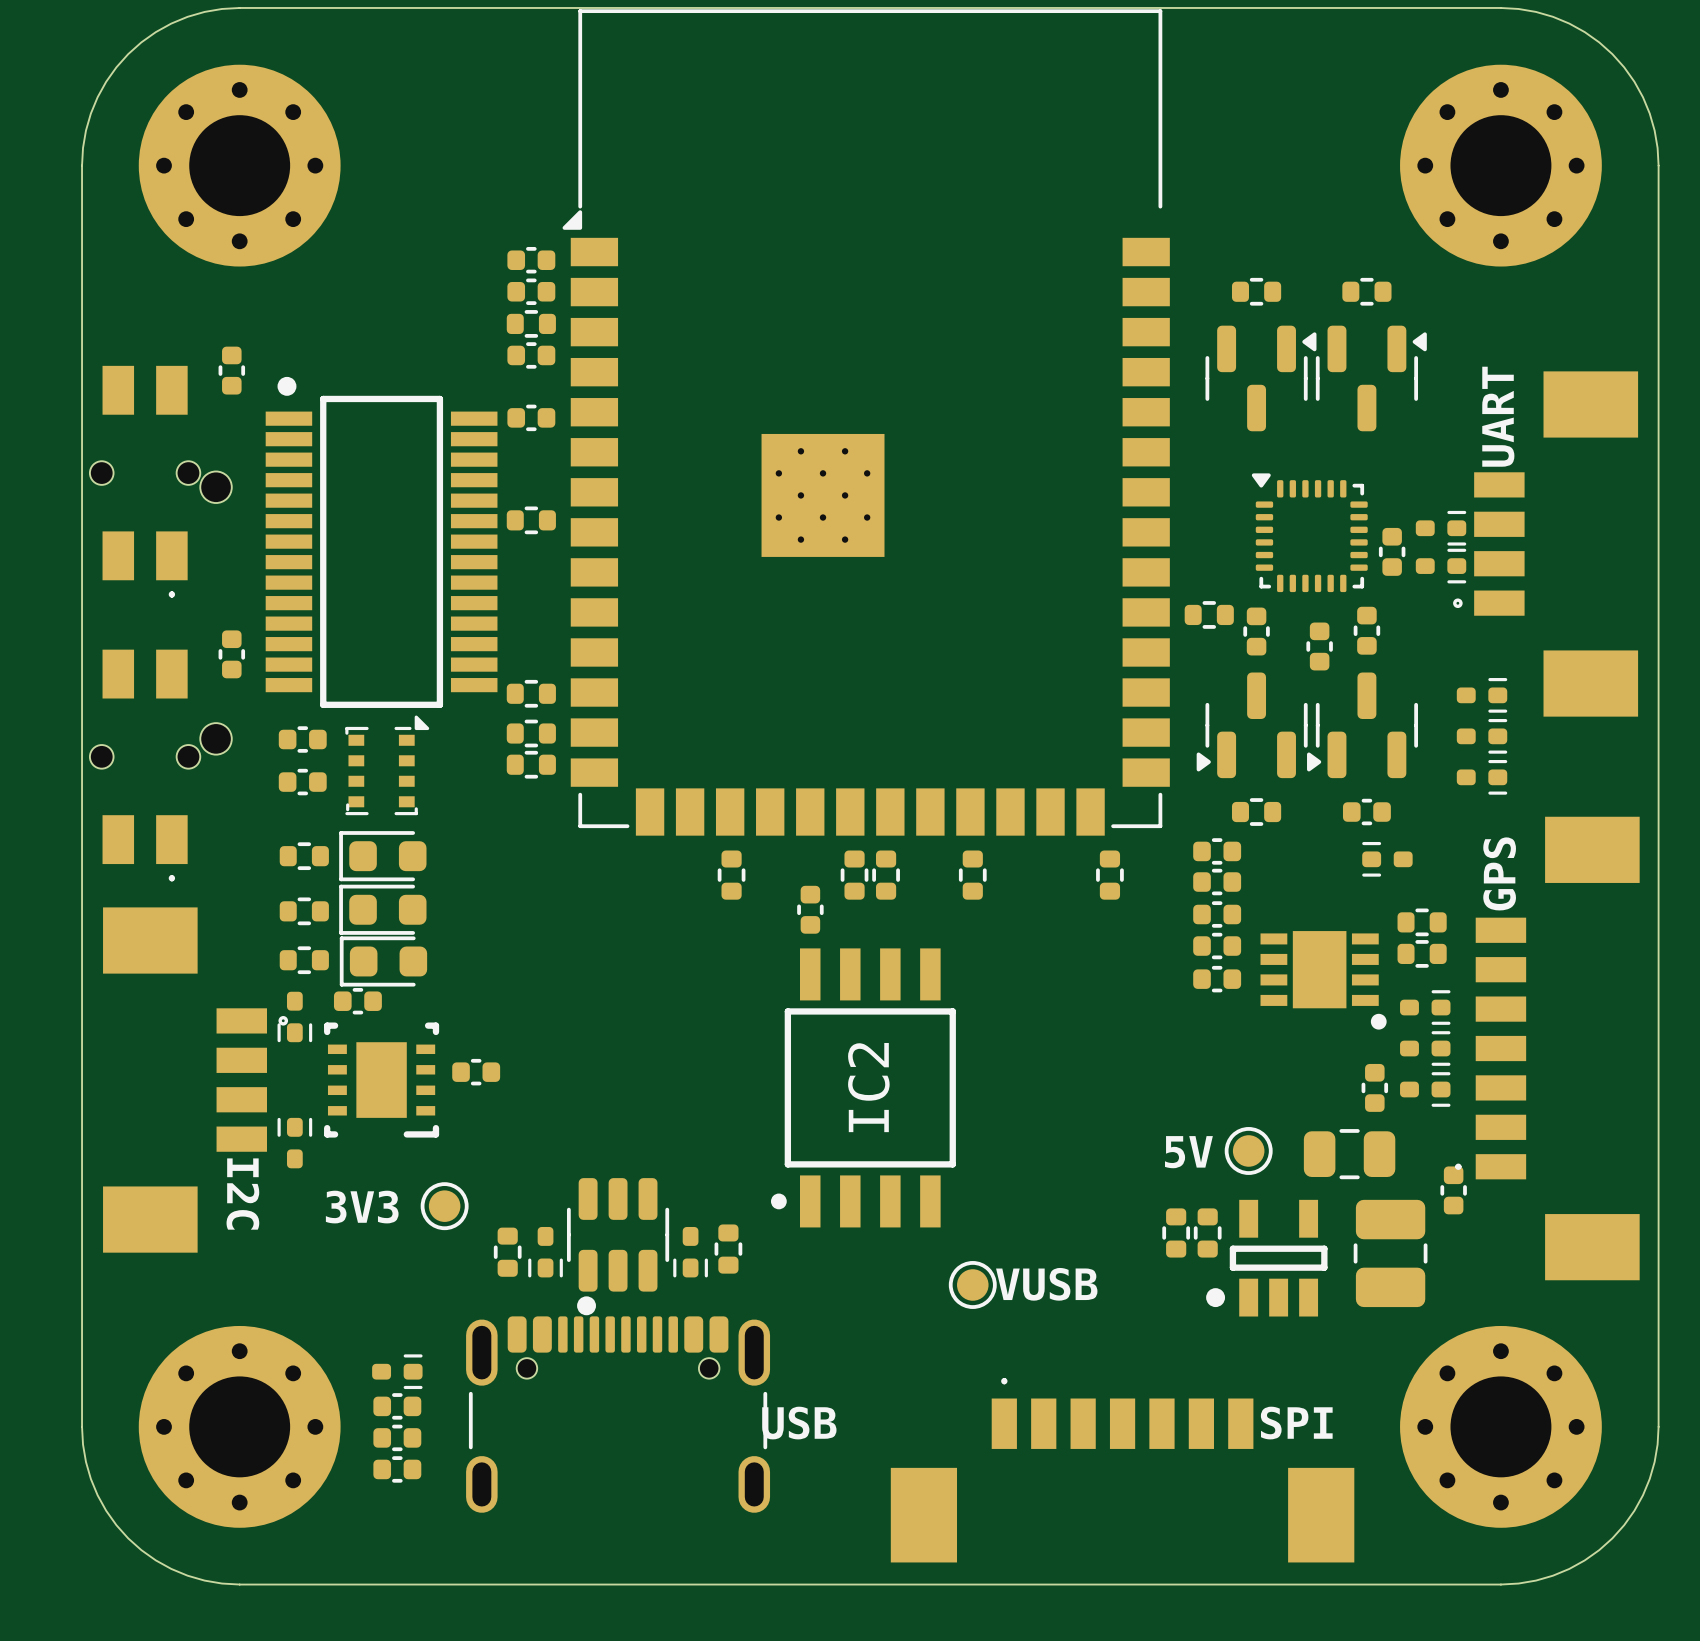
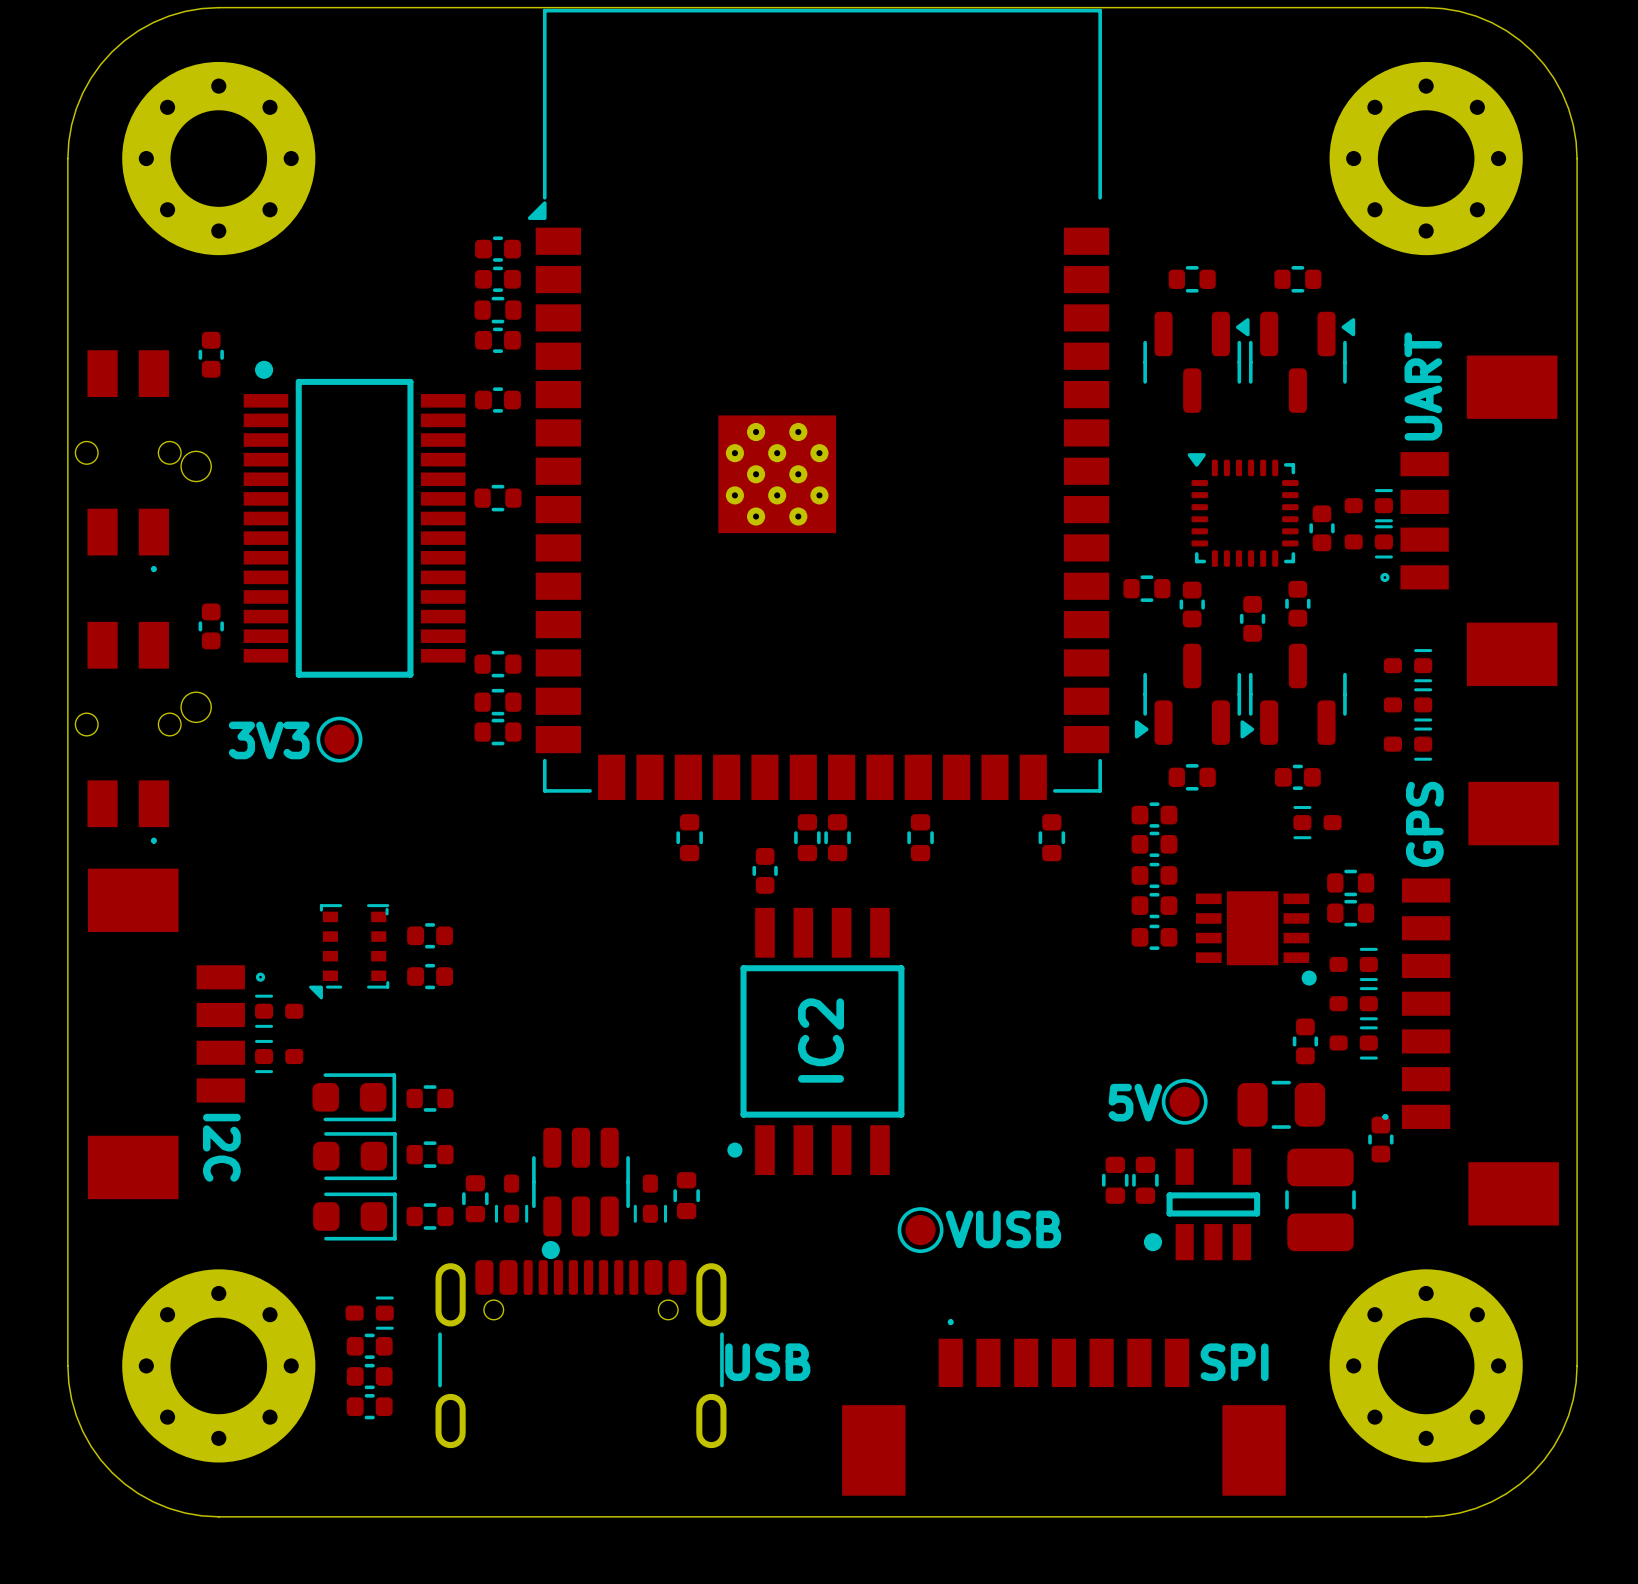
part footprint: [345, 715, 430, 816] -> [316, 716, 363, 763]
part: (302, 739) -> none
part: (302, 782) -> none
part: (304, 856) -> none
part: (382, 856) -> none
part: (382, 909) -> none
part: (304, 911) -> none
part: (304, 960) -> none
part: (383, 961) -> none
part: none -> (430, 935)
part: none -> (349, 951)
part: (357, 1001) -> none
part rotation: 0° (294, 1016) -> 90° clockwise (279, 1011)
part position: (294, 1016) -> (279, 1011)
part: none -> (430, 976)
part: (476, 1072) -> none
part: (381, 1080) -> none
part rotation: 0° (294, 1143) -> 90° counterclockwise (279, 1056)
part position: (294, 1143) -> (279, 1056)
part: none -> (354, 1097)
part: none -> (430, 1098)
part footprint: [420, 1182, 469, 1231] -> [406, 1141, 454, 1168]
text position: 3V3 (362, 1207) -> 3V3 (269, 740)
part: none -> (354, 1156)
part: none -> (354, 1216)
part: none -> (430, 1216)

